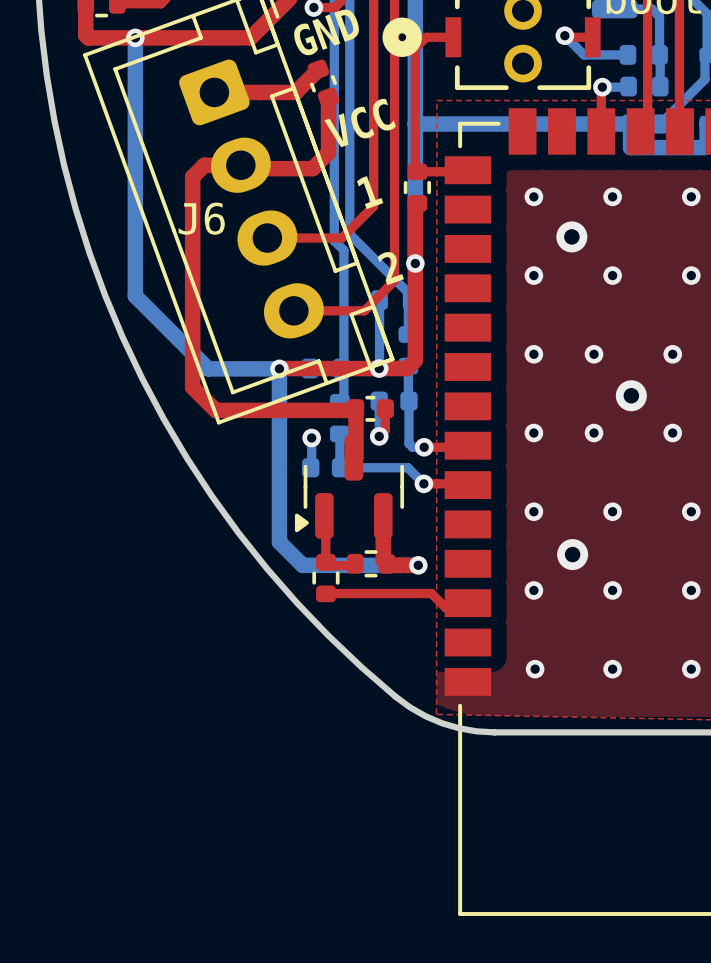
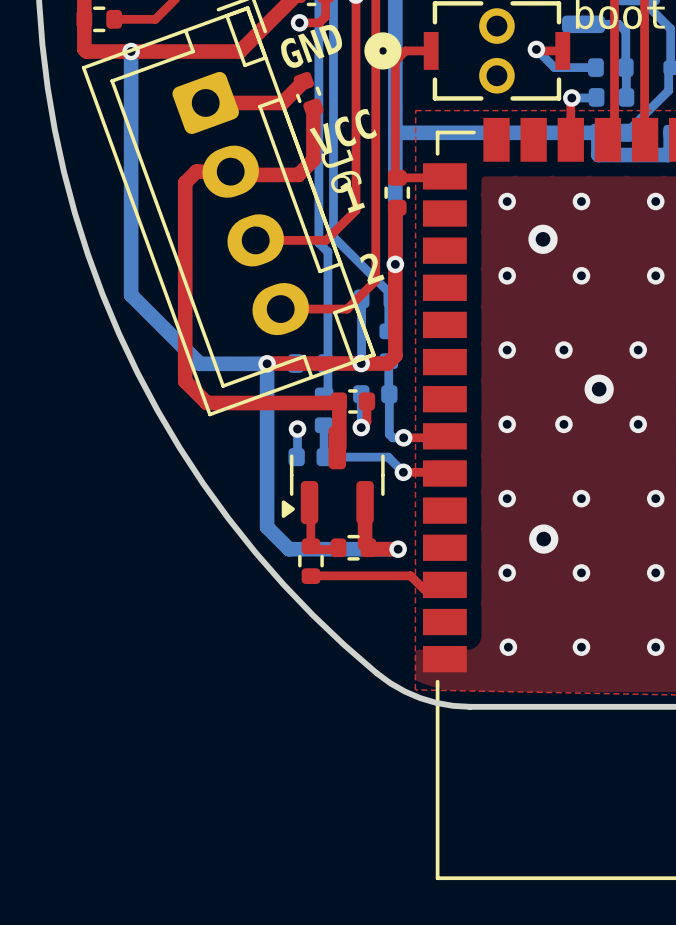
J6 name rotation: 0° (201, 218) -> 70° clockwise (341, 171)
J6 name position: J6 (201, 218) -> J6 (341, 171)

